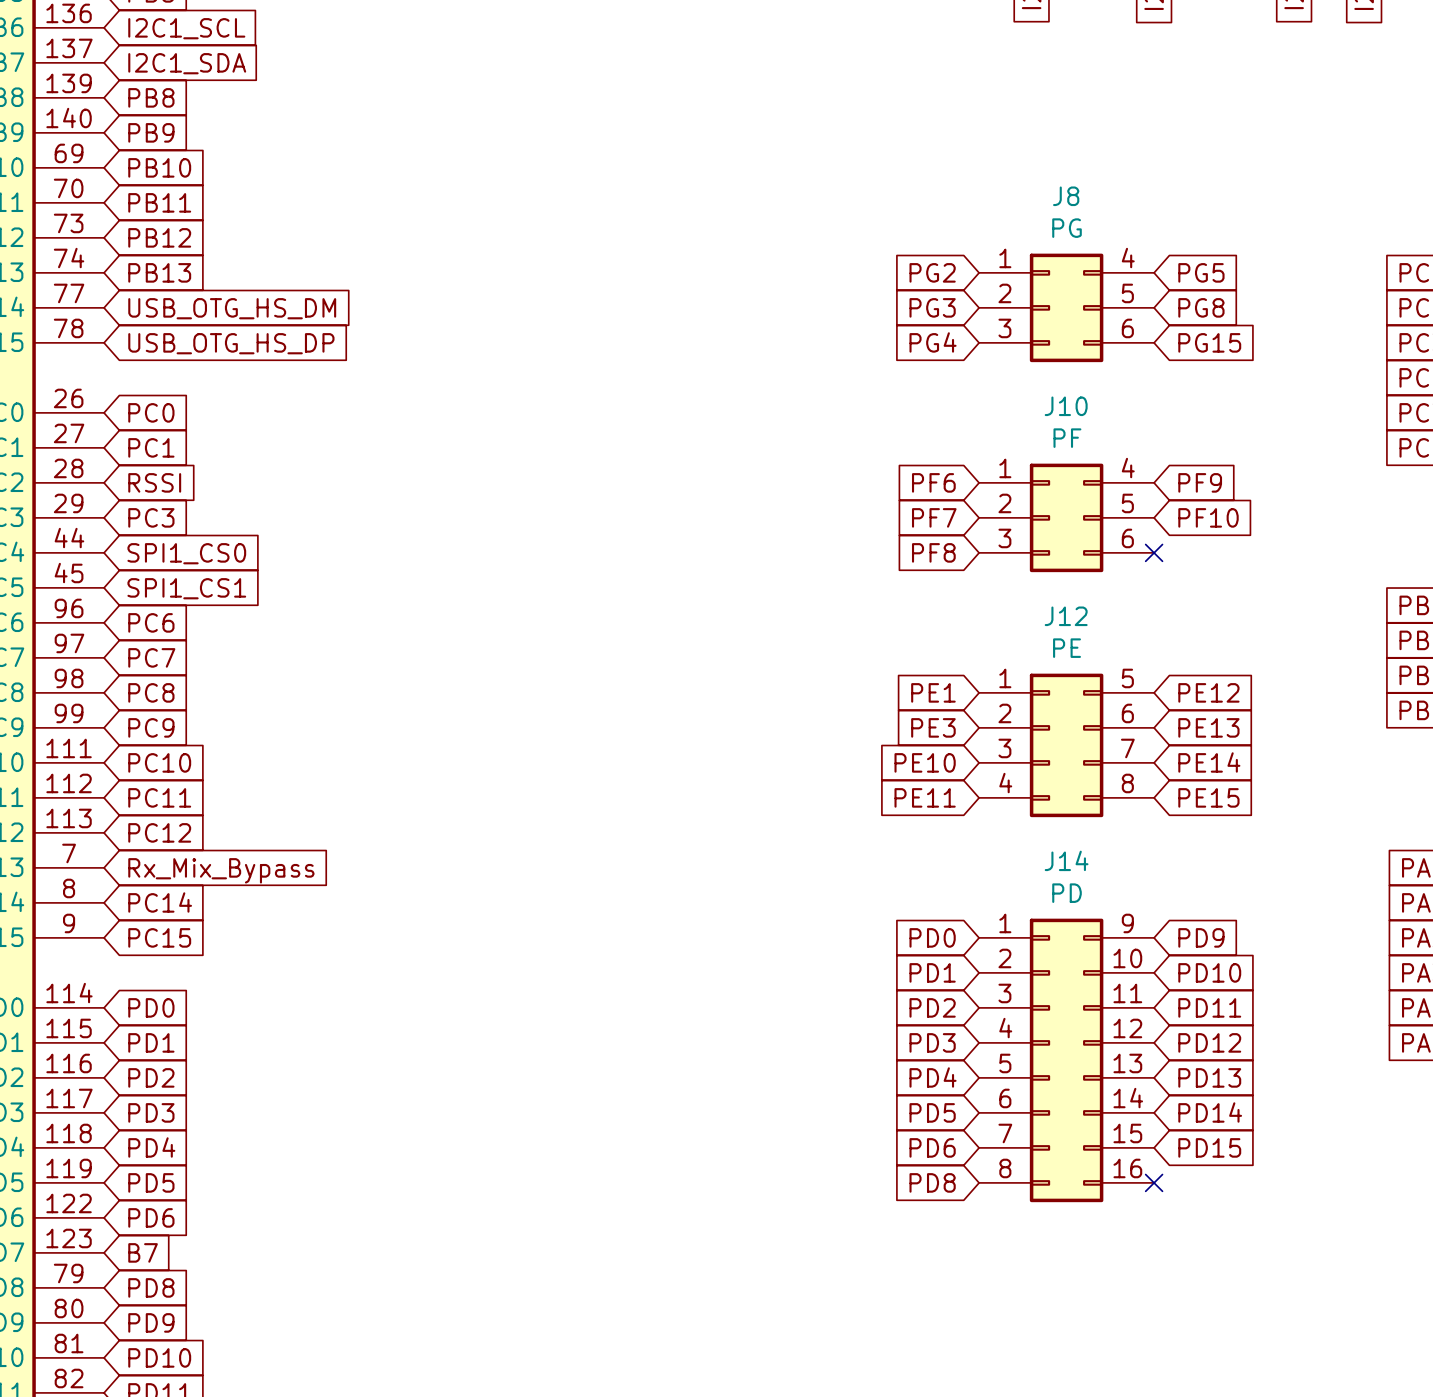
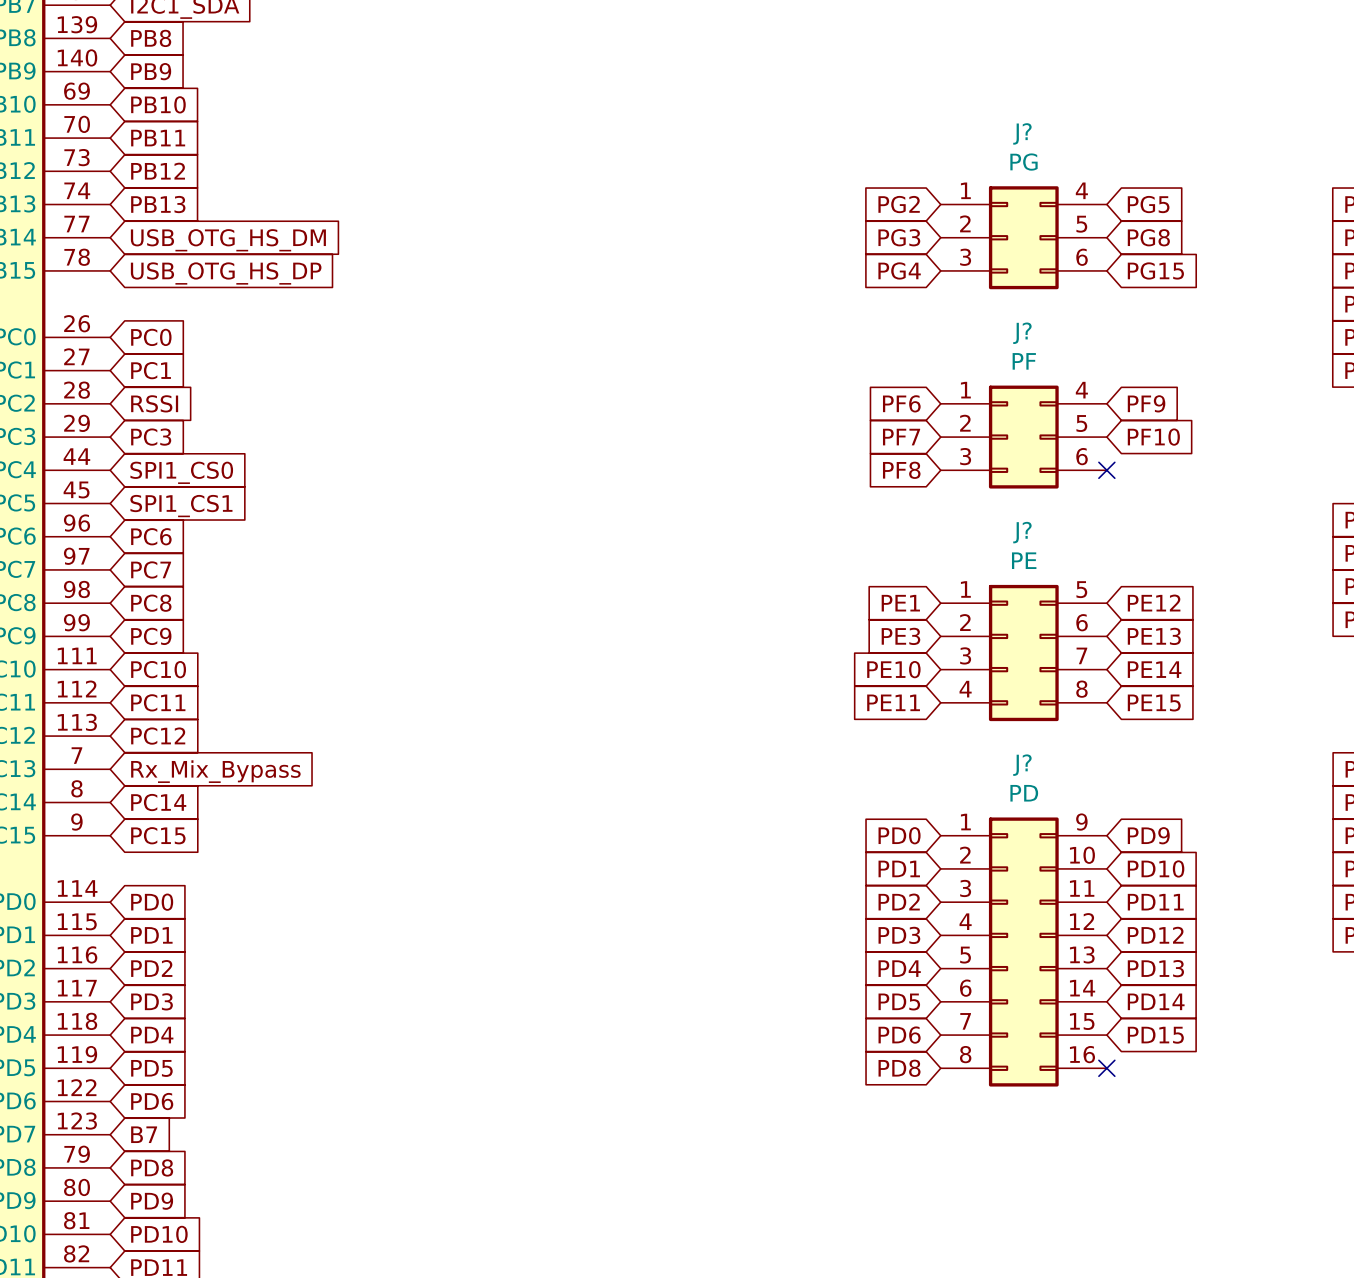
J8 name: J8 (1066, 196) -> J? (1022, 133)
J10 name: J10 (1066, 406) -> J? (1022, 333)
J12 name: J12 (1066, 616) -> J? (1022, 532)
J14 name: J14 (1066, 860) -> J? (1022, 765)

